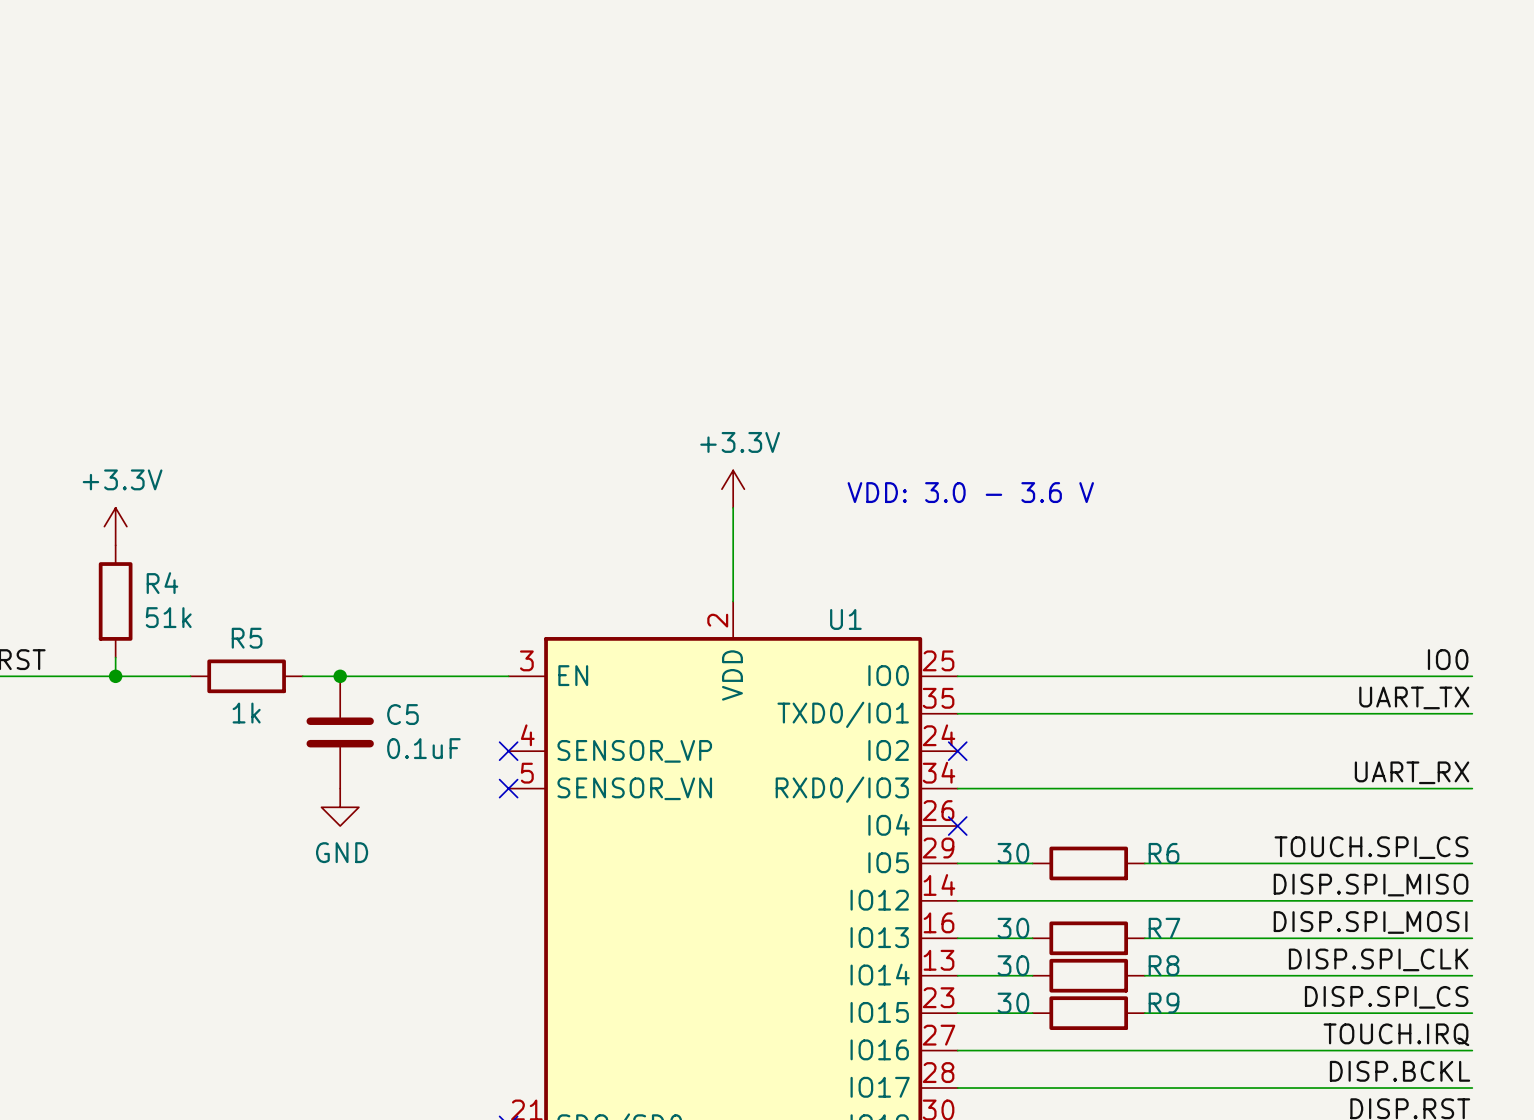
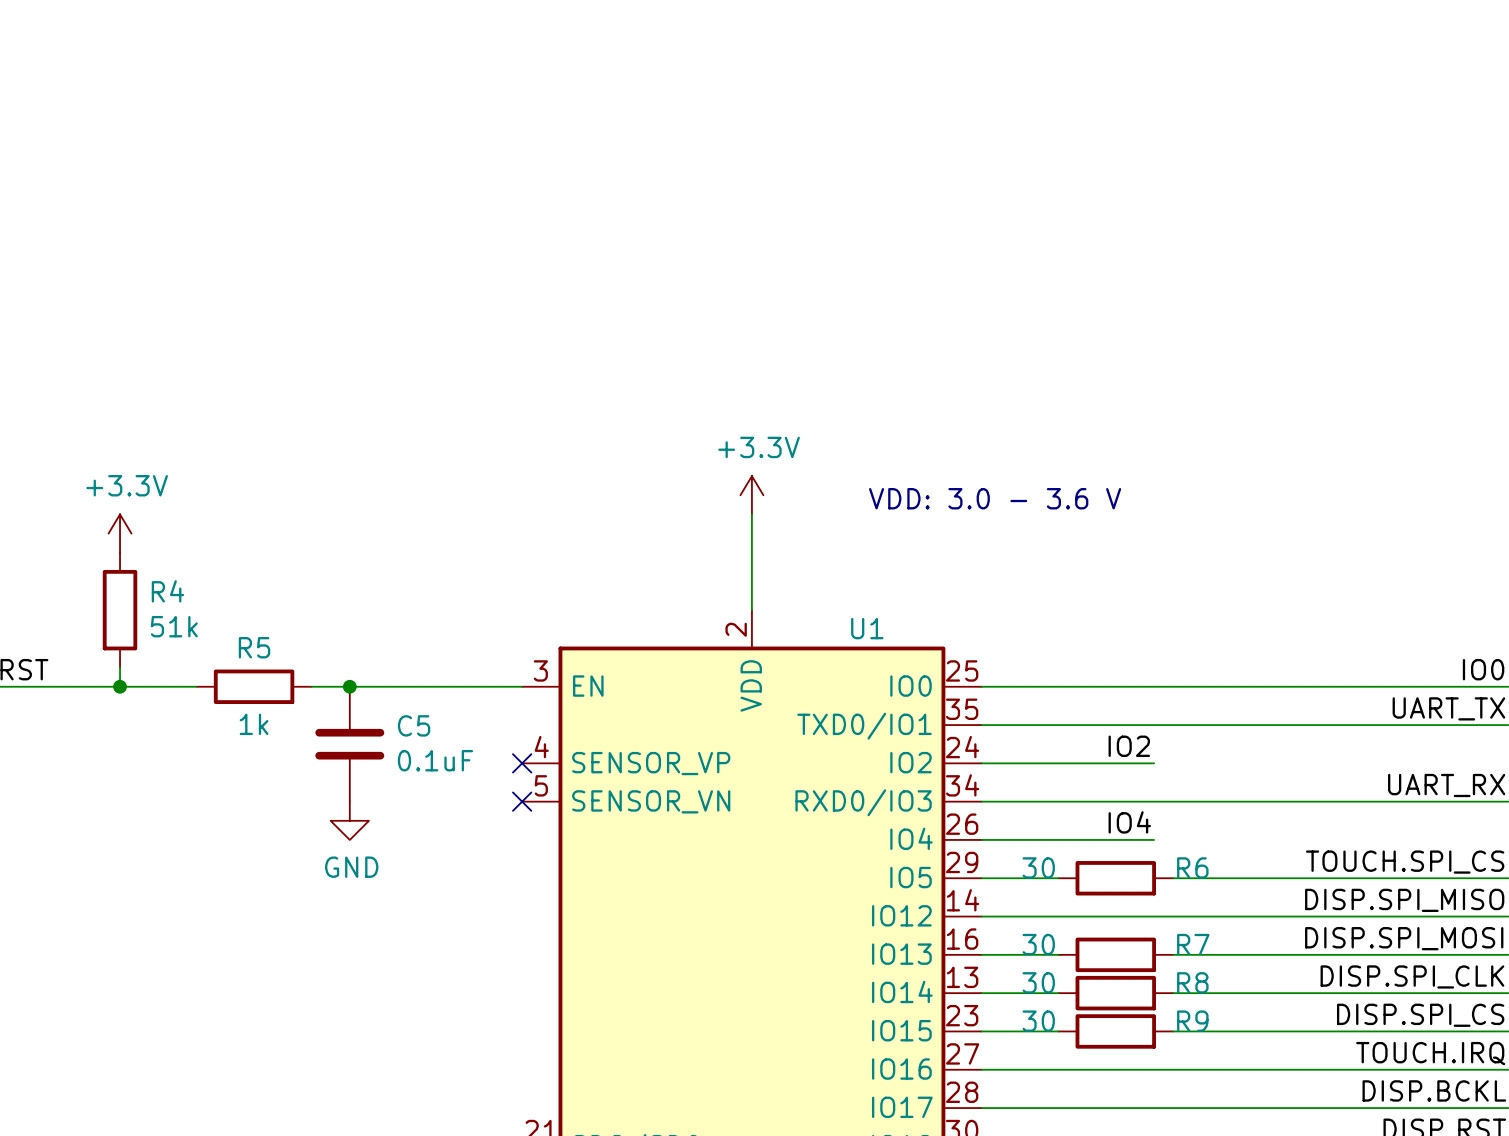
label: none -> IO2 (1129, 746)
wire: none -> (981, 763) (1154, 763)
no-connect mark: (957, 751) -> none
label: none -> IO4 (1129, 822)
wire: none -> (981, 839) (1154, 839)
no-connect mark: (957, 826) -> none

